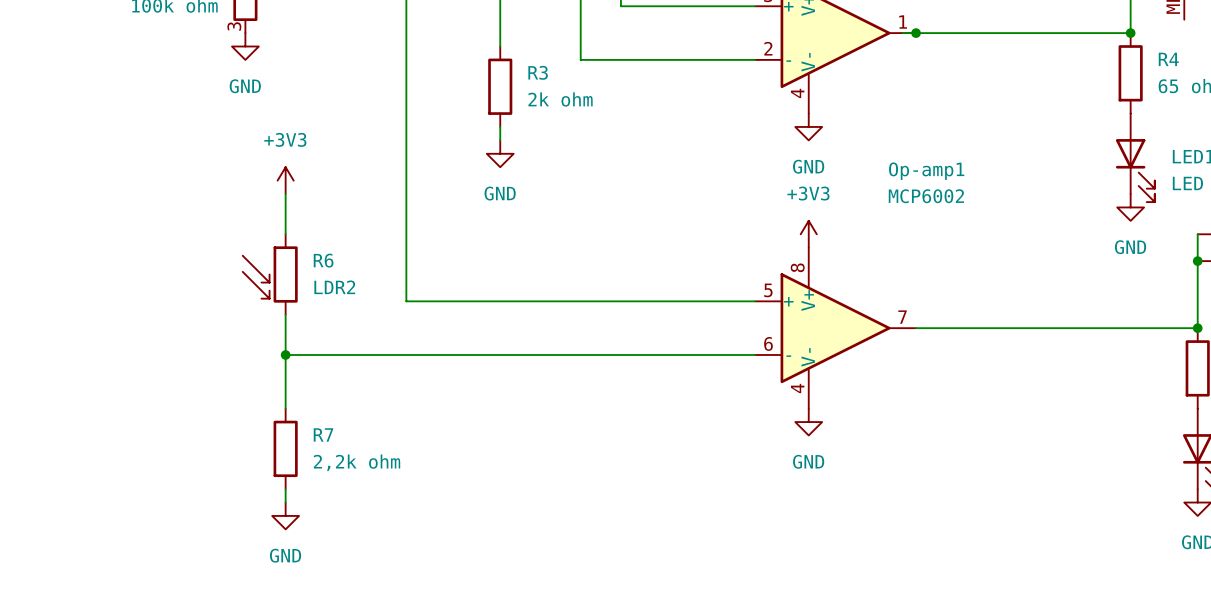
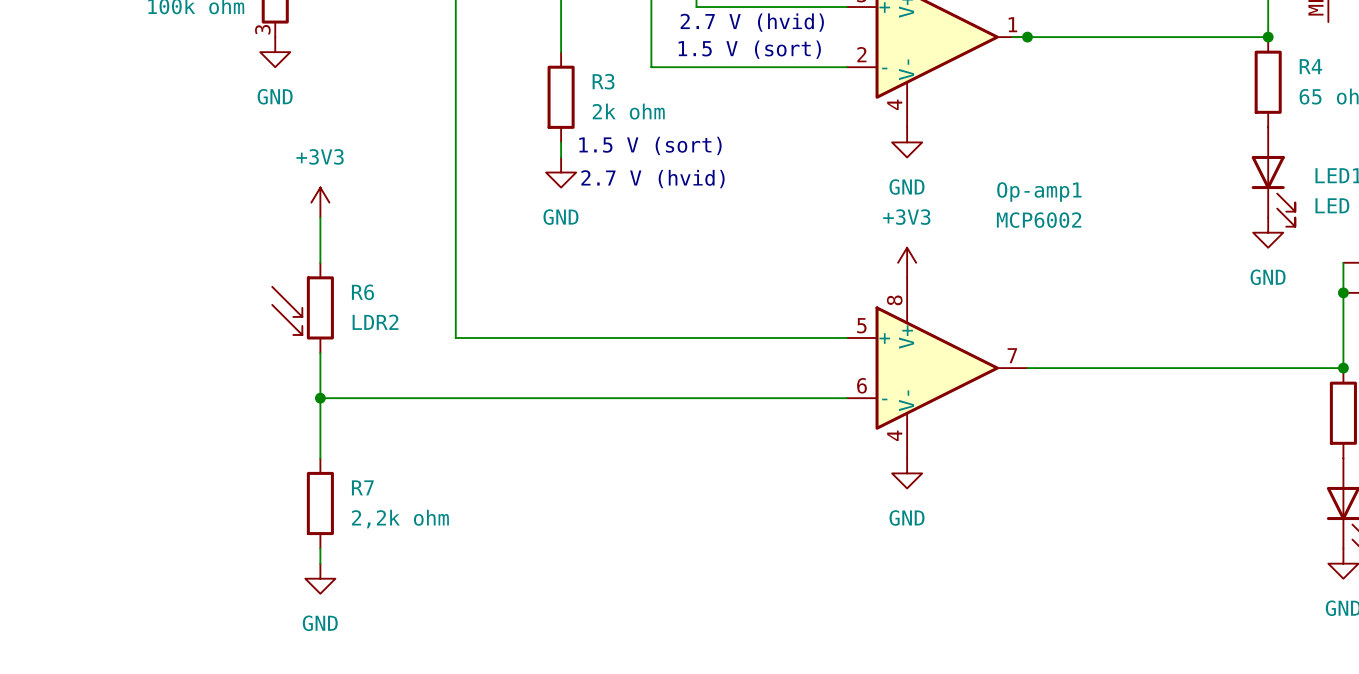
text: none -> 2.7 V (hvid) (752, 22)
text: none -> 1.5 V (sort) (749, 49)
text: none -> 1.5 V (sort) (650, 145)
text: none -> 2.7 V (hvid) (652, 179)

